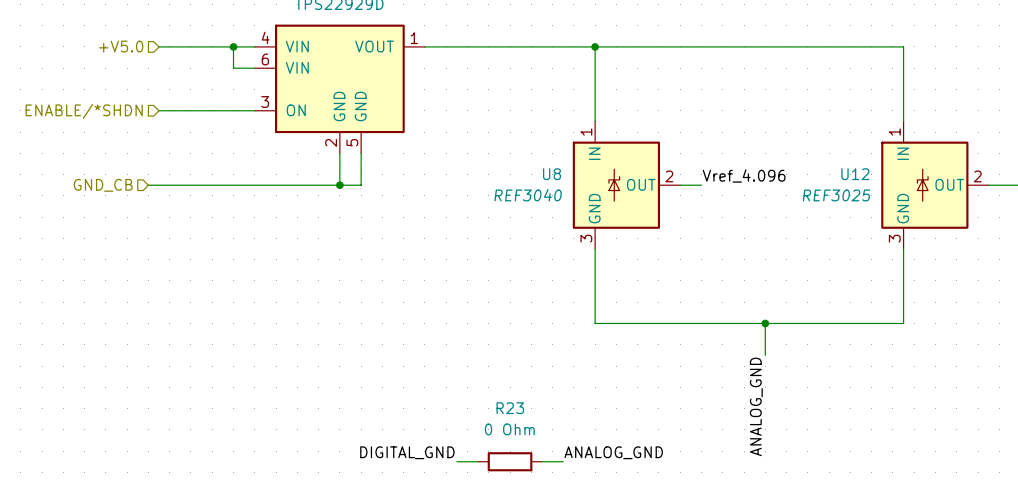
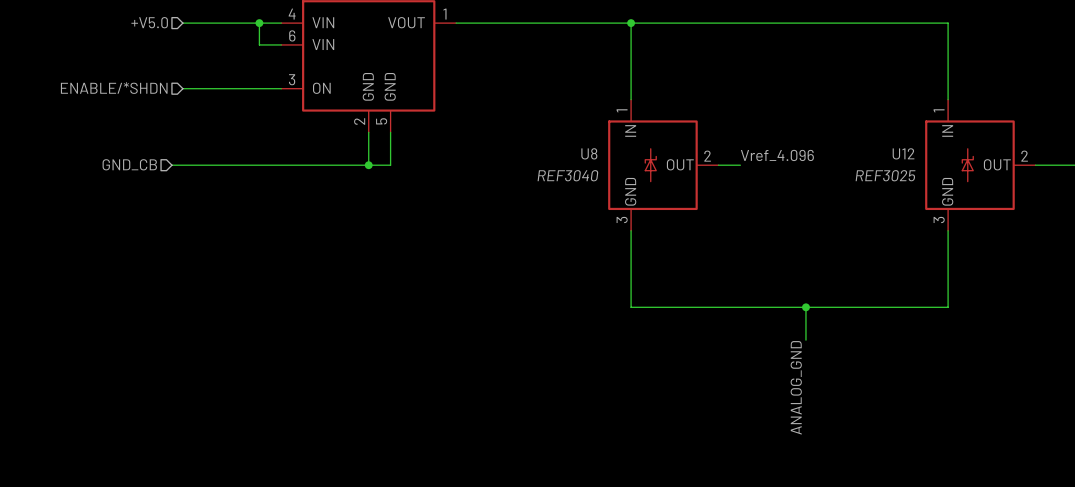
label: DIGITAL_GND (407, 452) -> none
label: ANALOG_GND (613, 452) -> none
wire: (456, 461) (478, 461) -> none
R23: 0 Ohm (510, 461) -> none
wire: (541, 461) (563, 461) -> none

